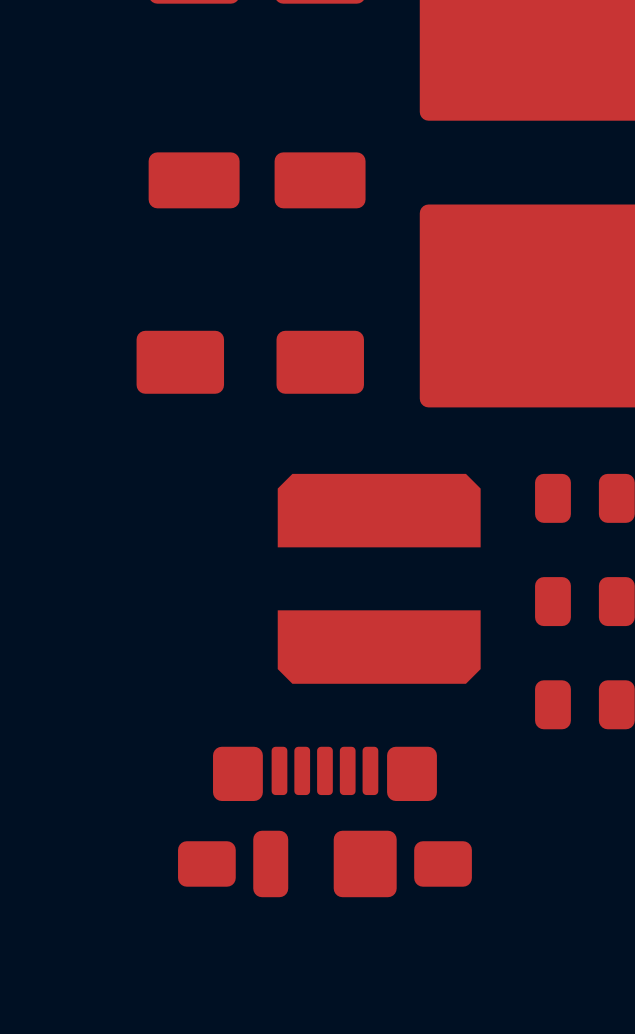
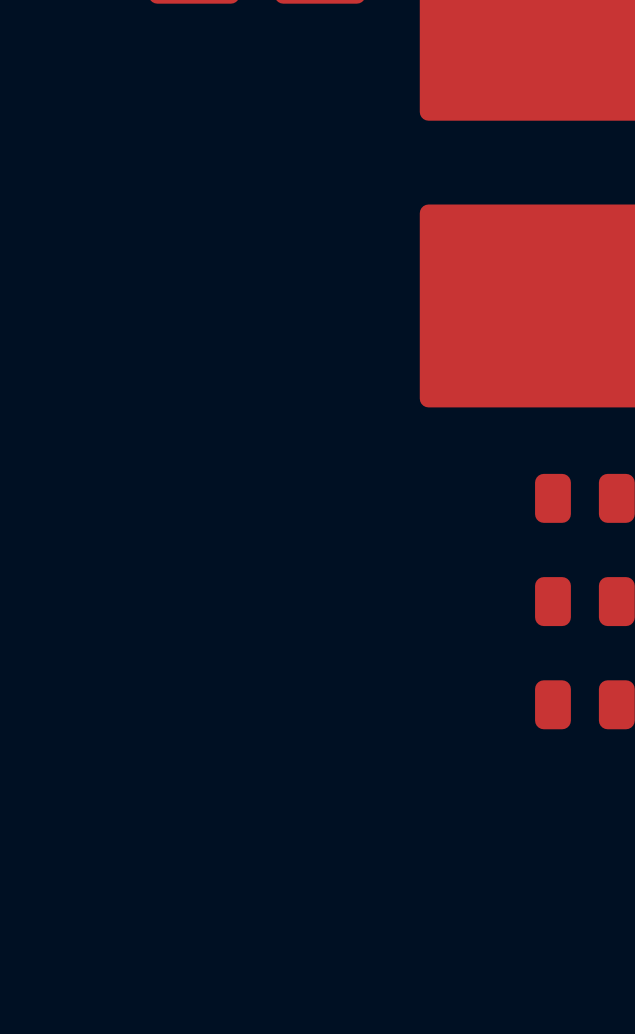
part: (257, 180) -> none
part: (250, 362) -> none
part: (379, 578) -> none
part: (324, 821) -> none

